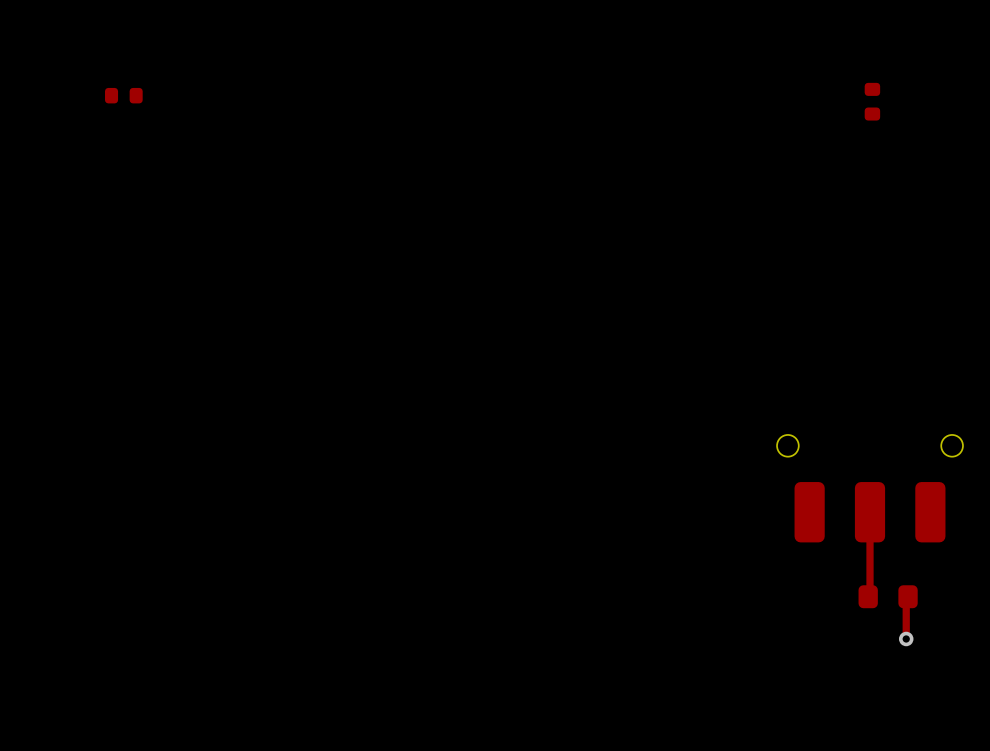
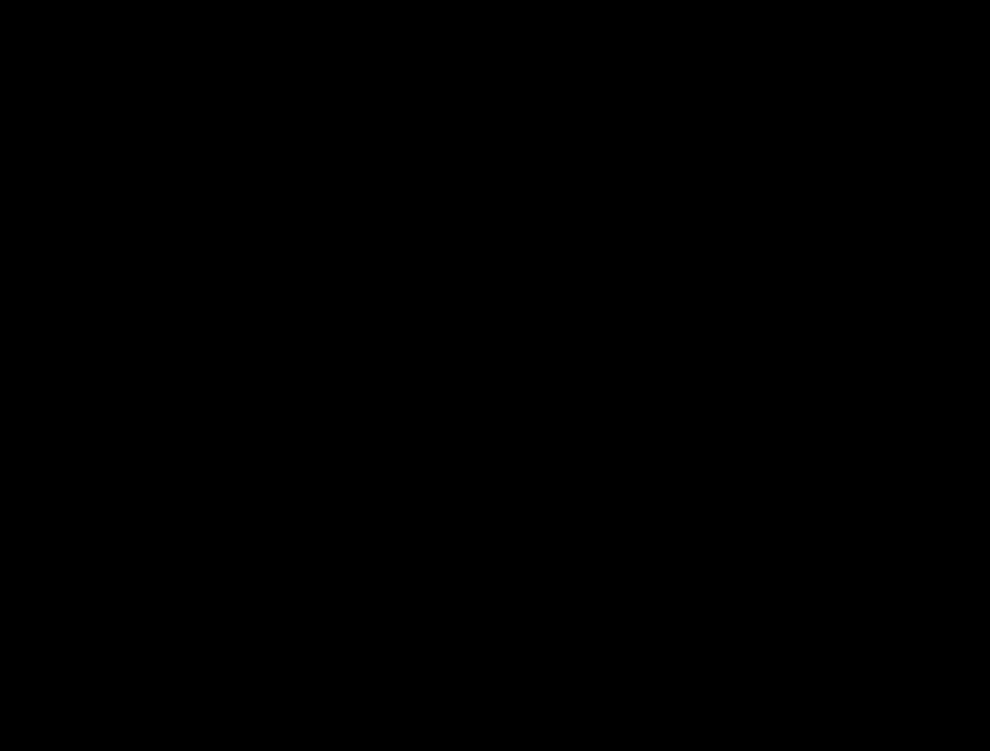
part: (123, 95) -> none
part: (872, 101) -> none
part: (870, 488) -> none
top track: (870, 512) (870, 594) -> none
part: (888, 596) -> none
top track: (906, 598) (906, 638) -> none
via: (906, 638) -> none

